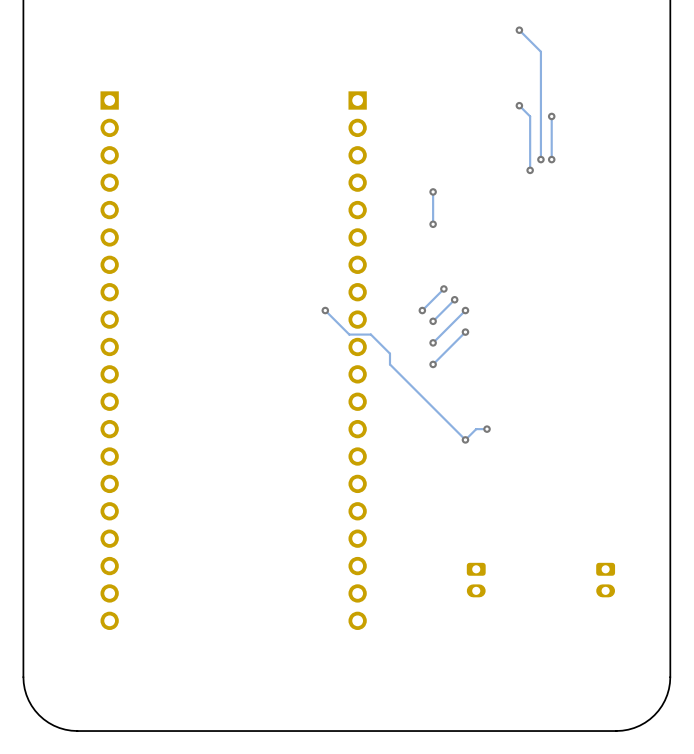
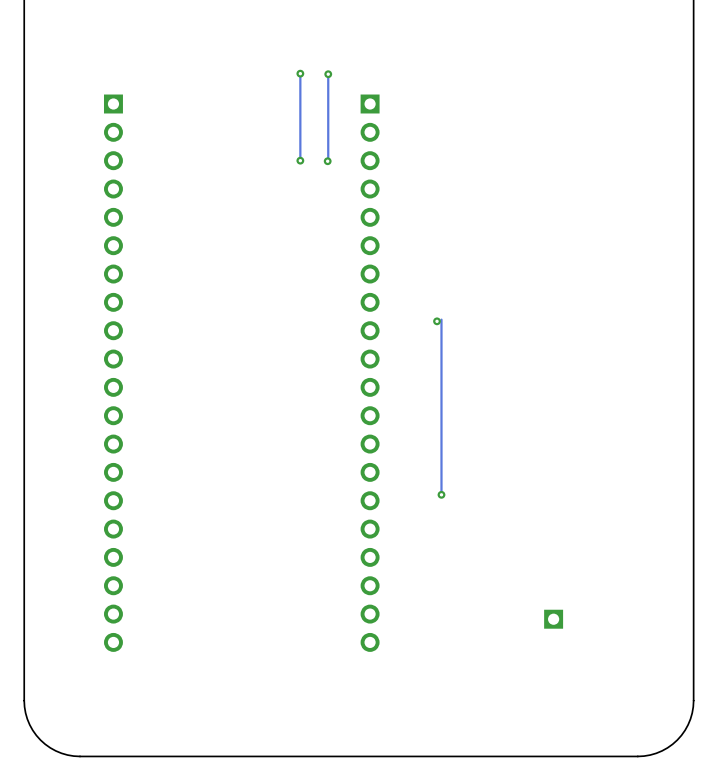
track: (519, 30) (540, 51) (540, 159) -> none
via: (519, 30) -> none
track: none -> (300, 73) (300, 160)
via: none -> (300, 73)
track: none -> (328, 74) (327, 161)
via: none -> (328, 74)
track: (519, 105) (530, 116) (530, 170) -> none
via: (519, 105) -> none
track: (551, 116) (551, 159) -> none
via: (551, 116) -> none
via: none -> (300, 160)
via: none -> (327, 161)
via: (540, 159) -> none
via: (551, 159) -> none
via: (530, 170) -> none
track: (433, 191) (433, 224) -> none
via: (433, 191) -> none
via: (433, 224) -> none
track: (443, 288) (422, 310) -> none
via: (443, 288) -> none
track: (454, 299) (433, 321) -> none
via: (454, 299) -> none
track: none -> (441, 319) (441, 494)
track: (325, 310) (349, 334) (370, 334) (389, 353) (389, 364) (465, 439) (476, 429) (487, 429) -> none
via: (325, 310) -> none
track: (465, 310) (433, 342) -> none
via: (465, 310) -> none
via: (433, 321) -> none
track: (465, 332) (433, 364) -> none
via: (465, 332) -> none
via: (433, 342) -> none
via: (433, 364) -> none
via: (487, 429) -> none
via: (465, 439) -> none
via: none -> (441, 494)
part: (476, 580) -> none
part: (605, 580) -> none
part: none -> (553, 619)

